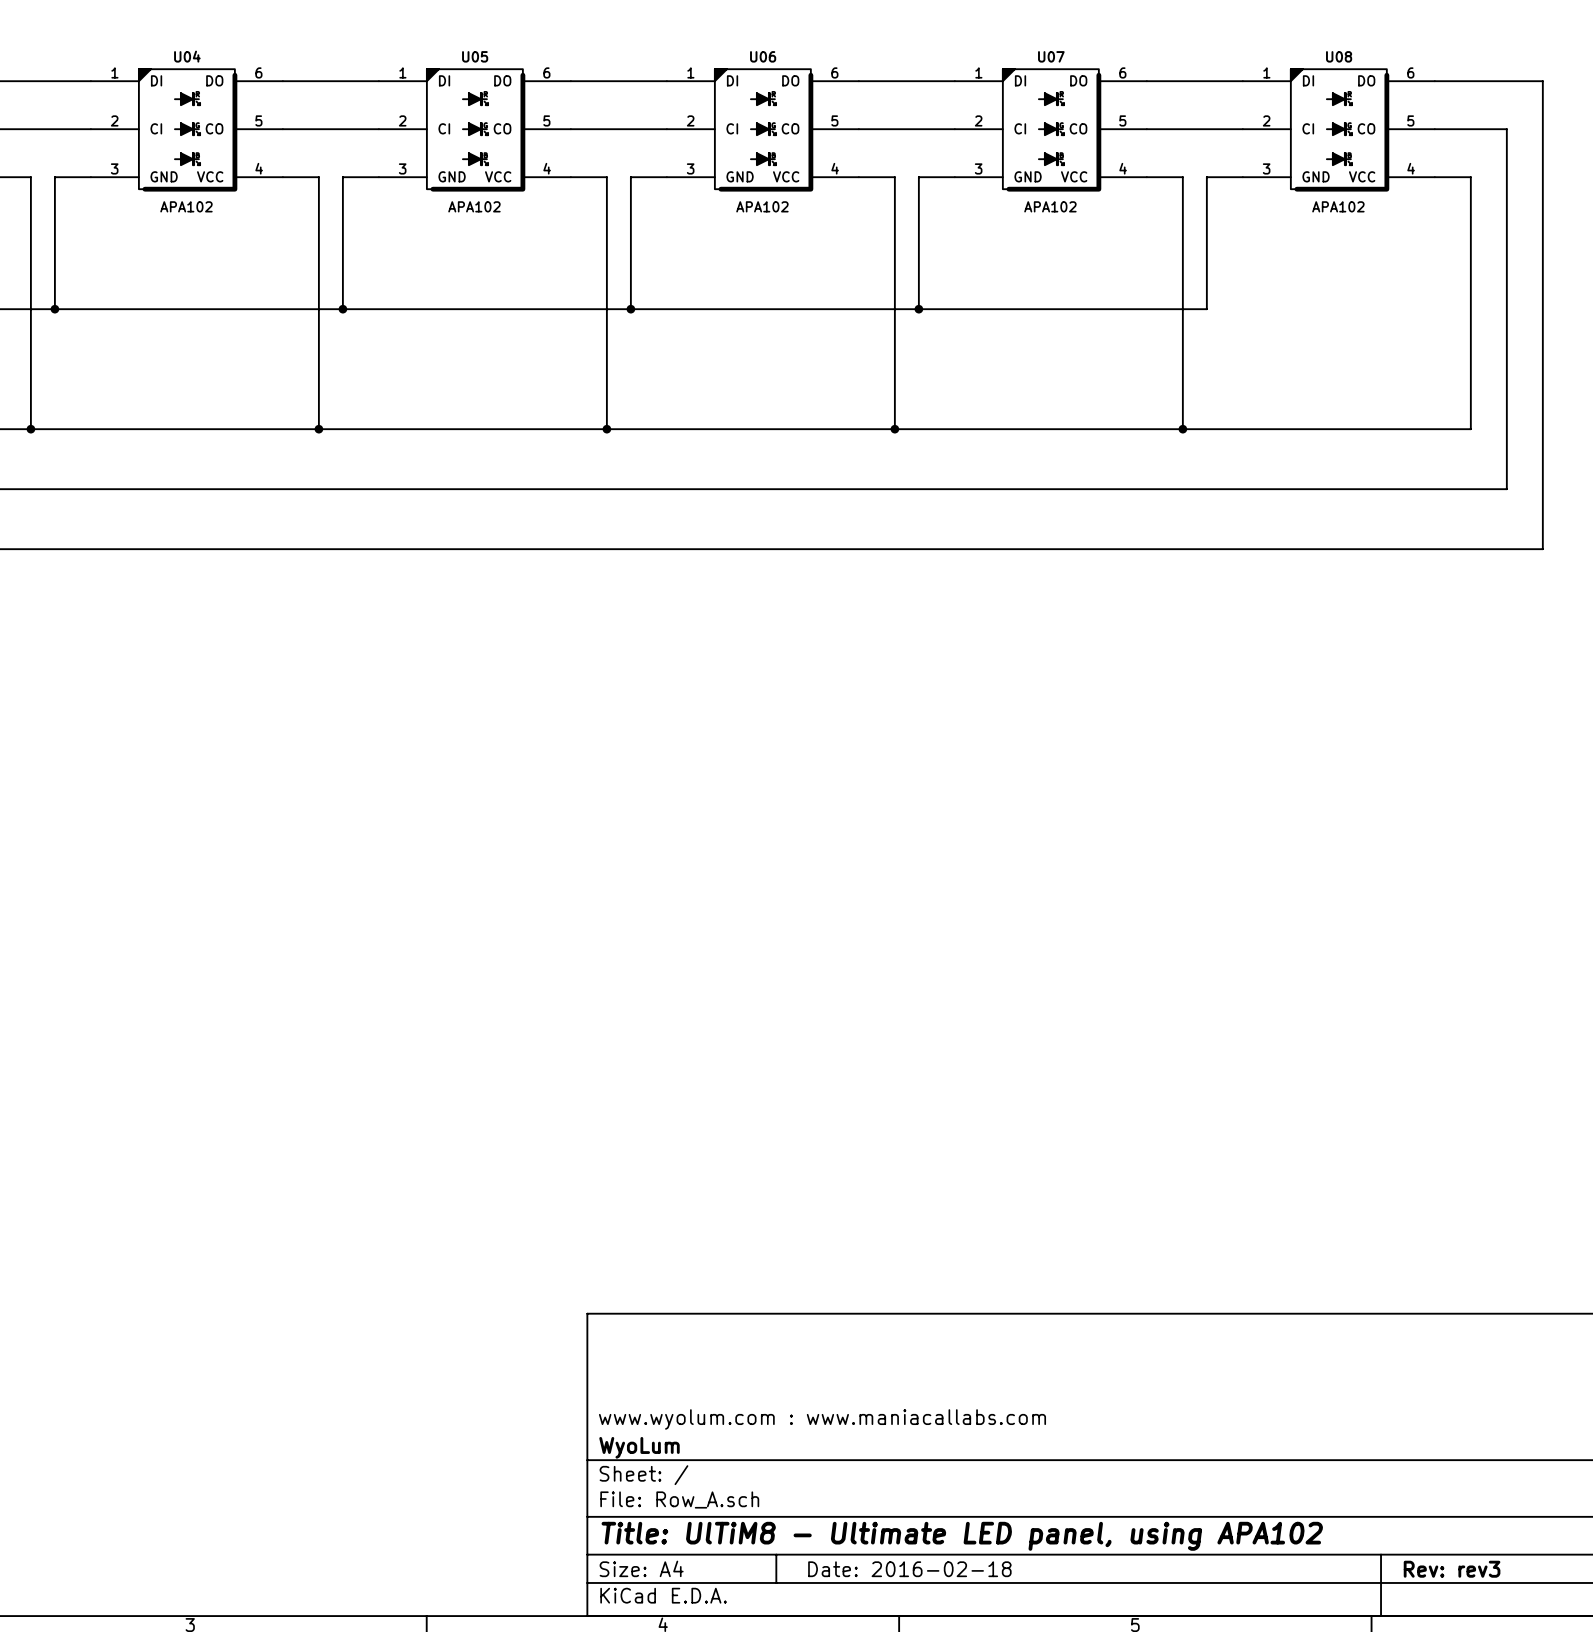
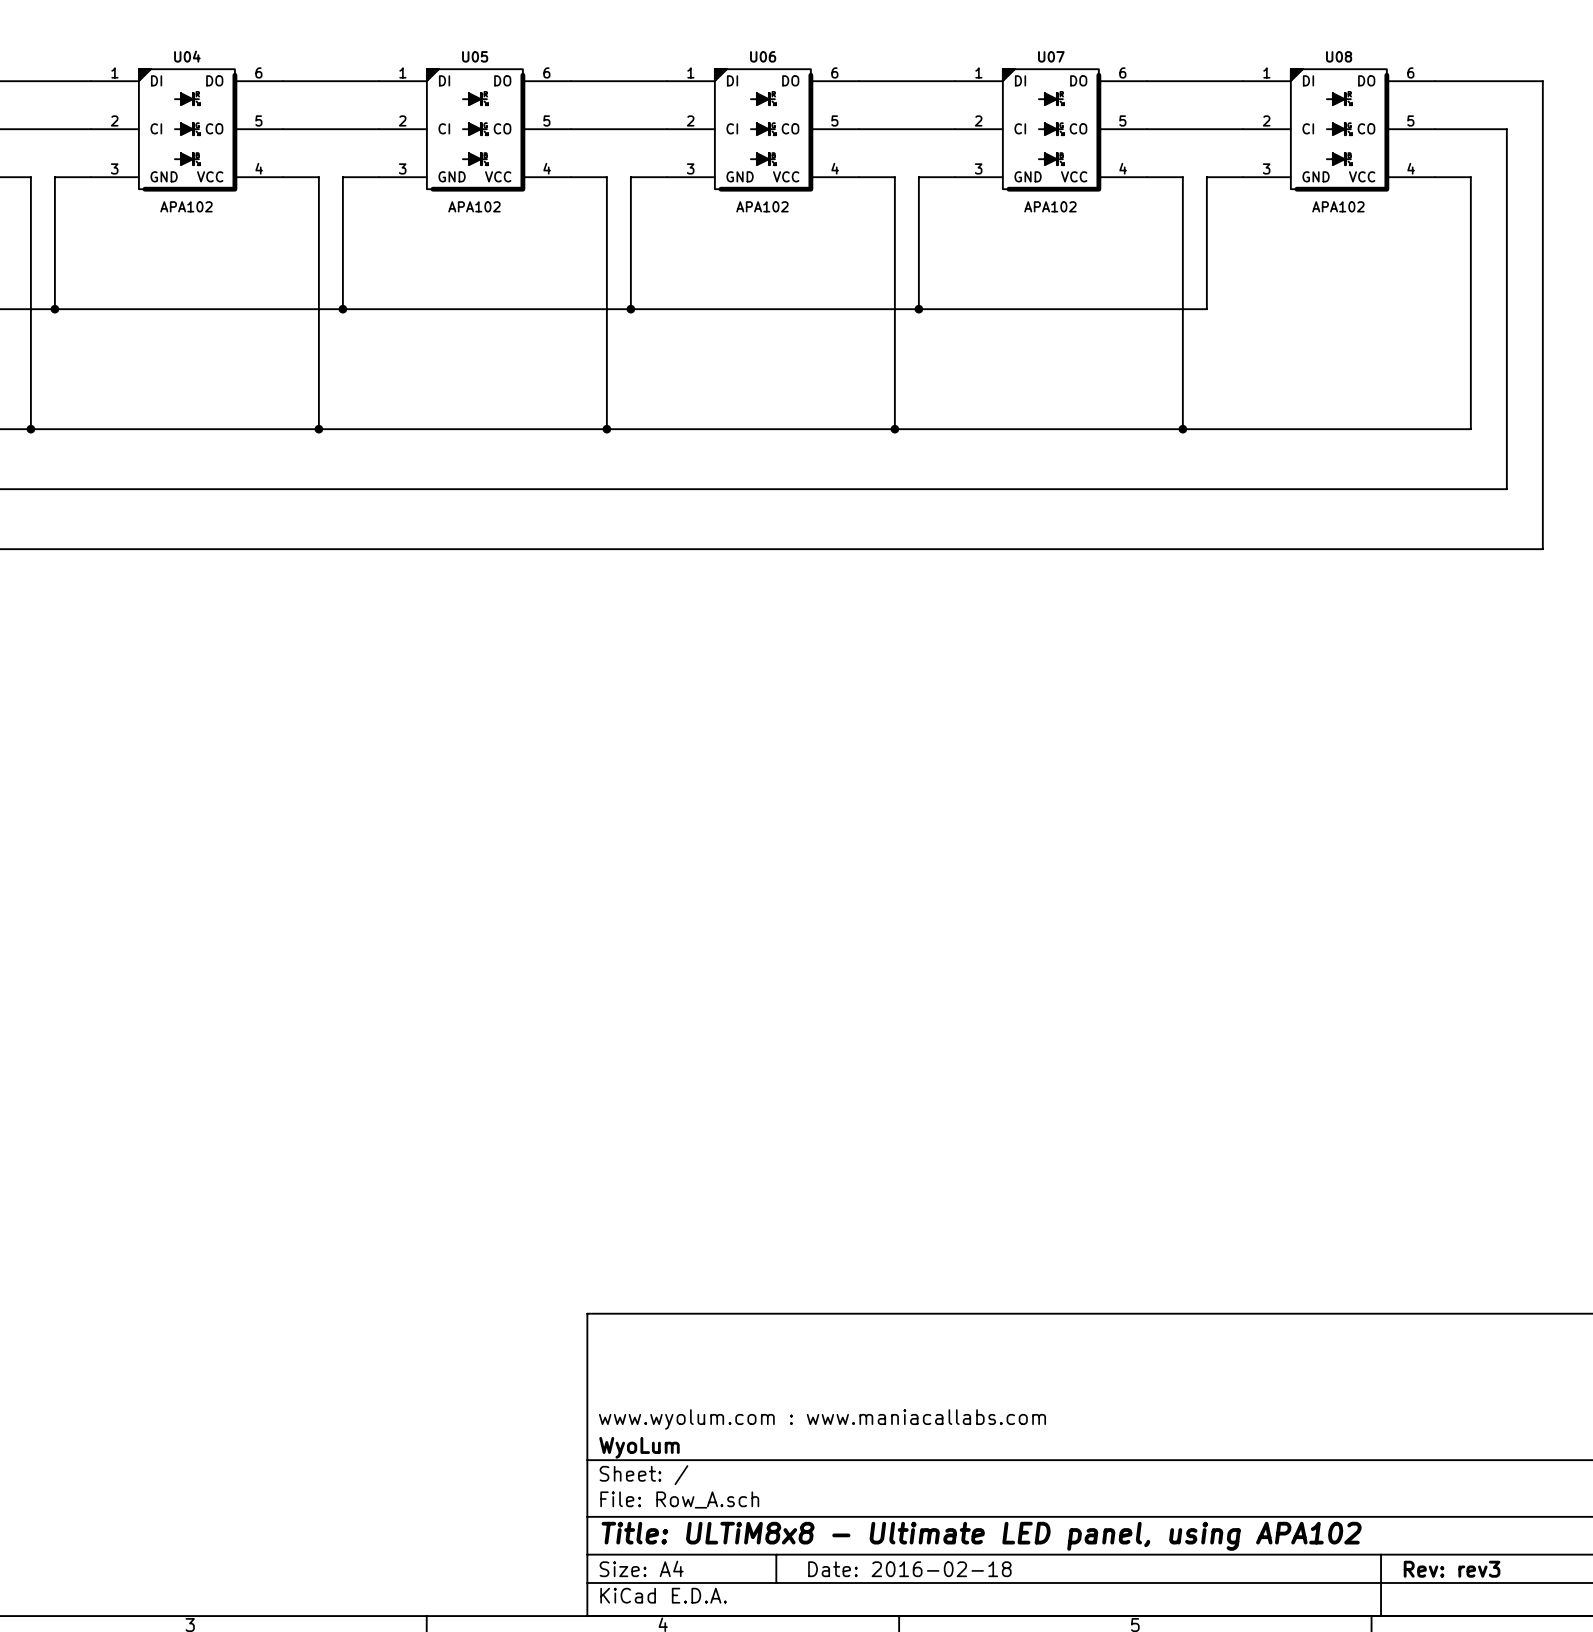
title block: Title: UlTiM8 - Ultimate LED panel, using APA102 (962, 1536) -> Title: ULTiM8x8 - Ultimate LED panel, using APA102 (981, 1536)

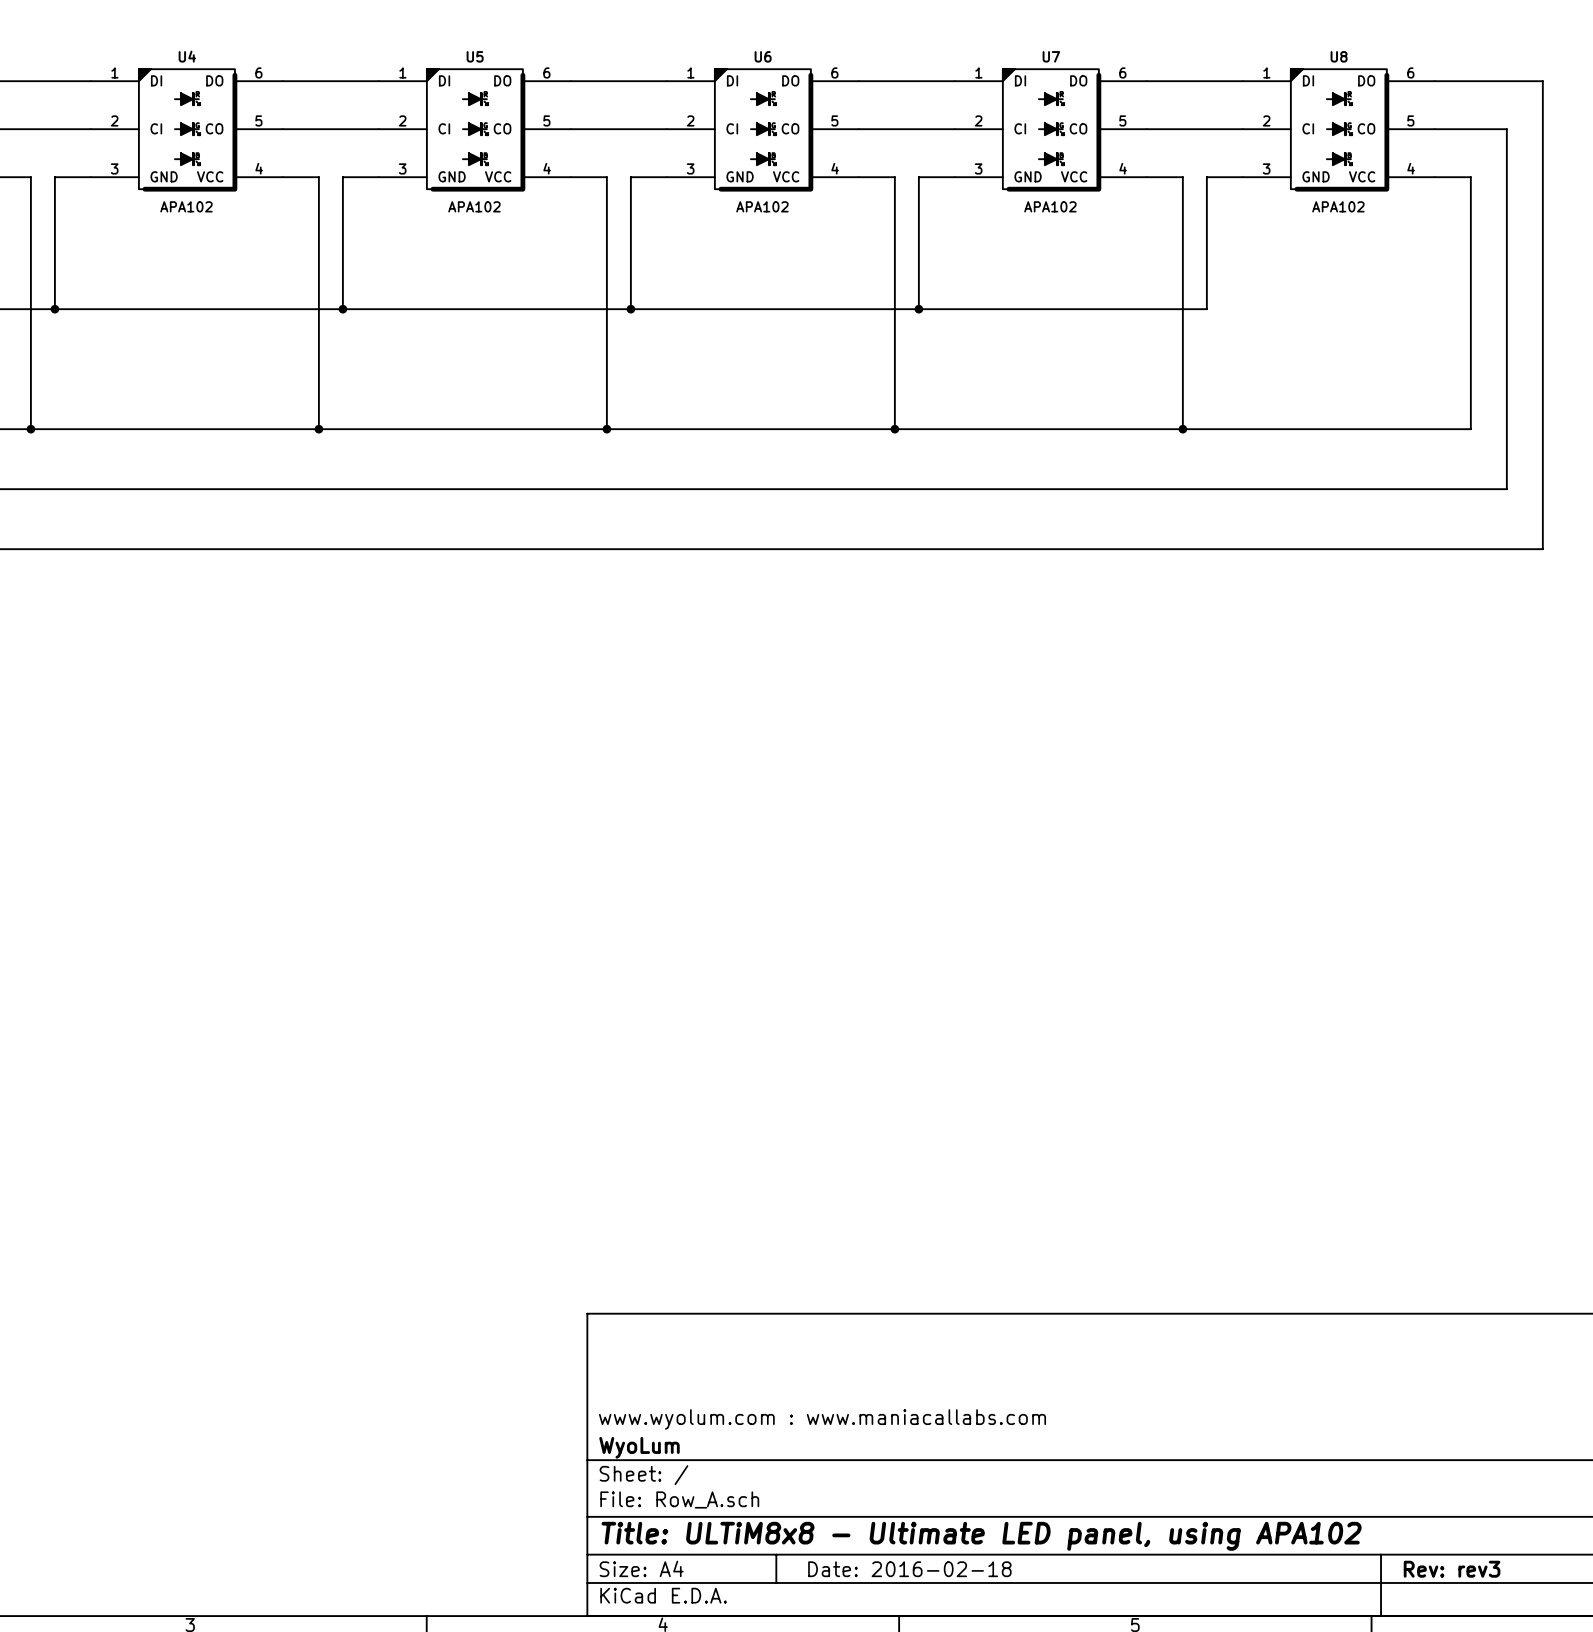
U04 name: U04 (187, 56) -> U4 (187, 56)
U05 name: U05 (475, 56) -> U5 (475, 56)
U06 name: U06 (763, 56) -> U6 (763, 56)
U07 name: U07 (1051, 56) -> U7 (1051, 56)
U08 name: U08 (1339, 56) -> U8 (1339, 56)

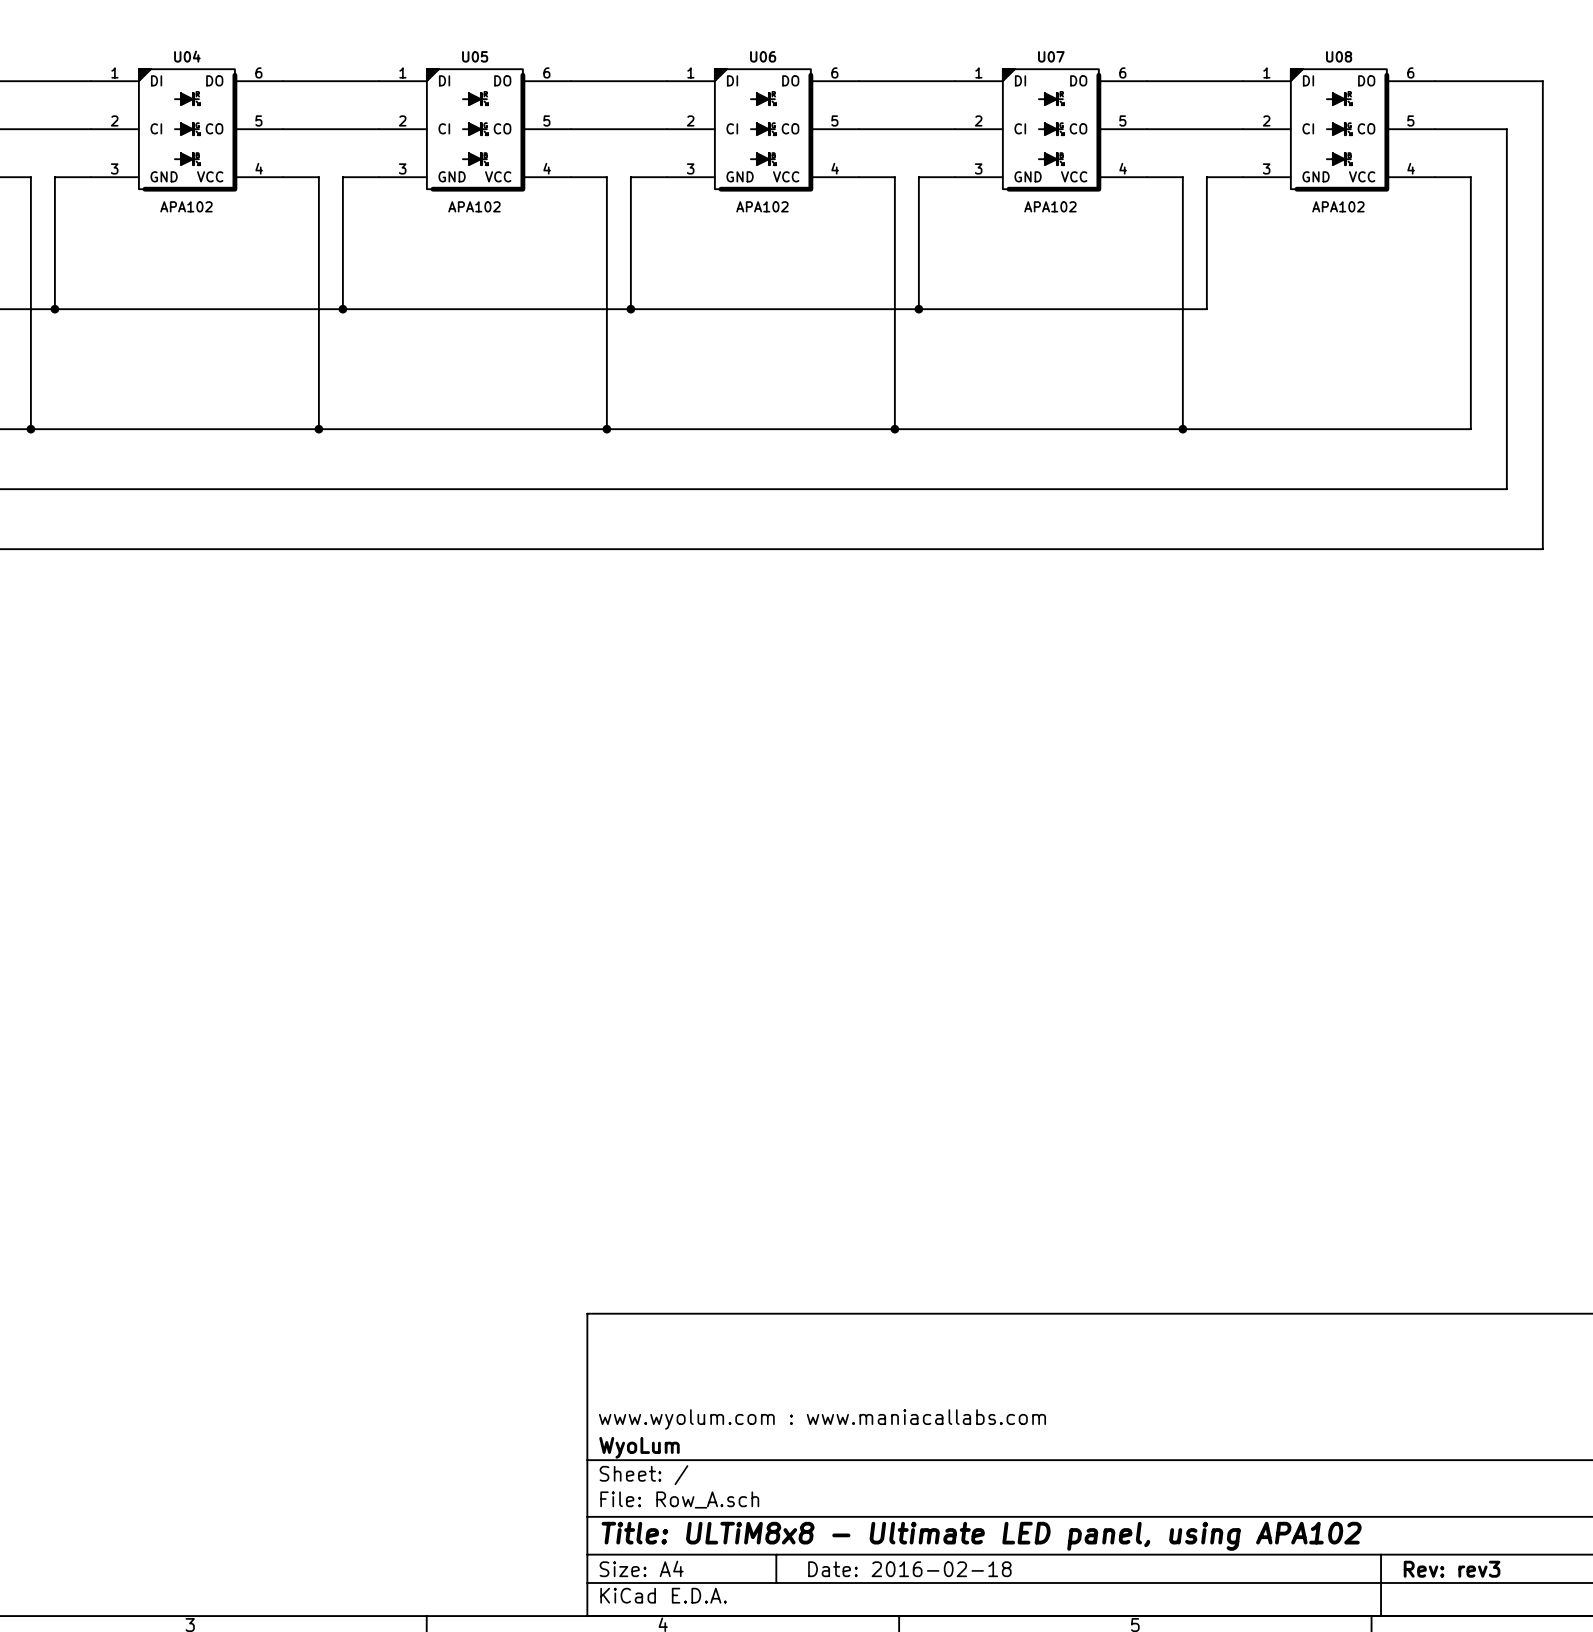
U4 name: U4 (187, 56) -> U04 (187, 56)
U5 name: U5 (475, 56) -> U05 (475, 56)
U6 name: U6 (763, 56) -> U06 (763, 56)
U7 name: U7 (1051, 56) -> U07 (1051, 56)
U8 name: U8 (1339, 56) -> U08 (1339, 56)

